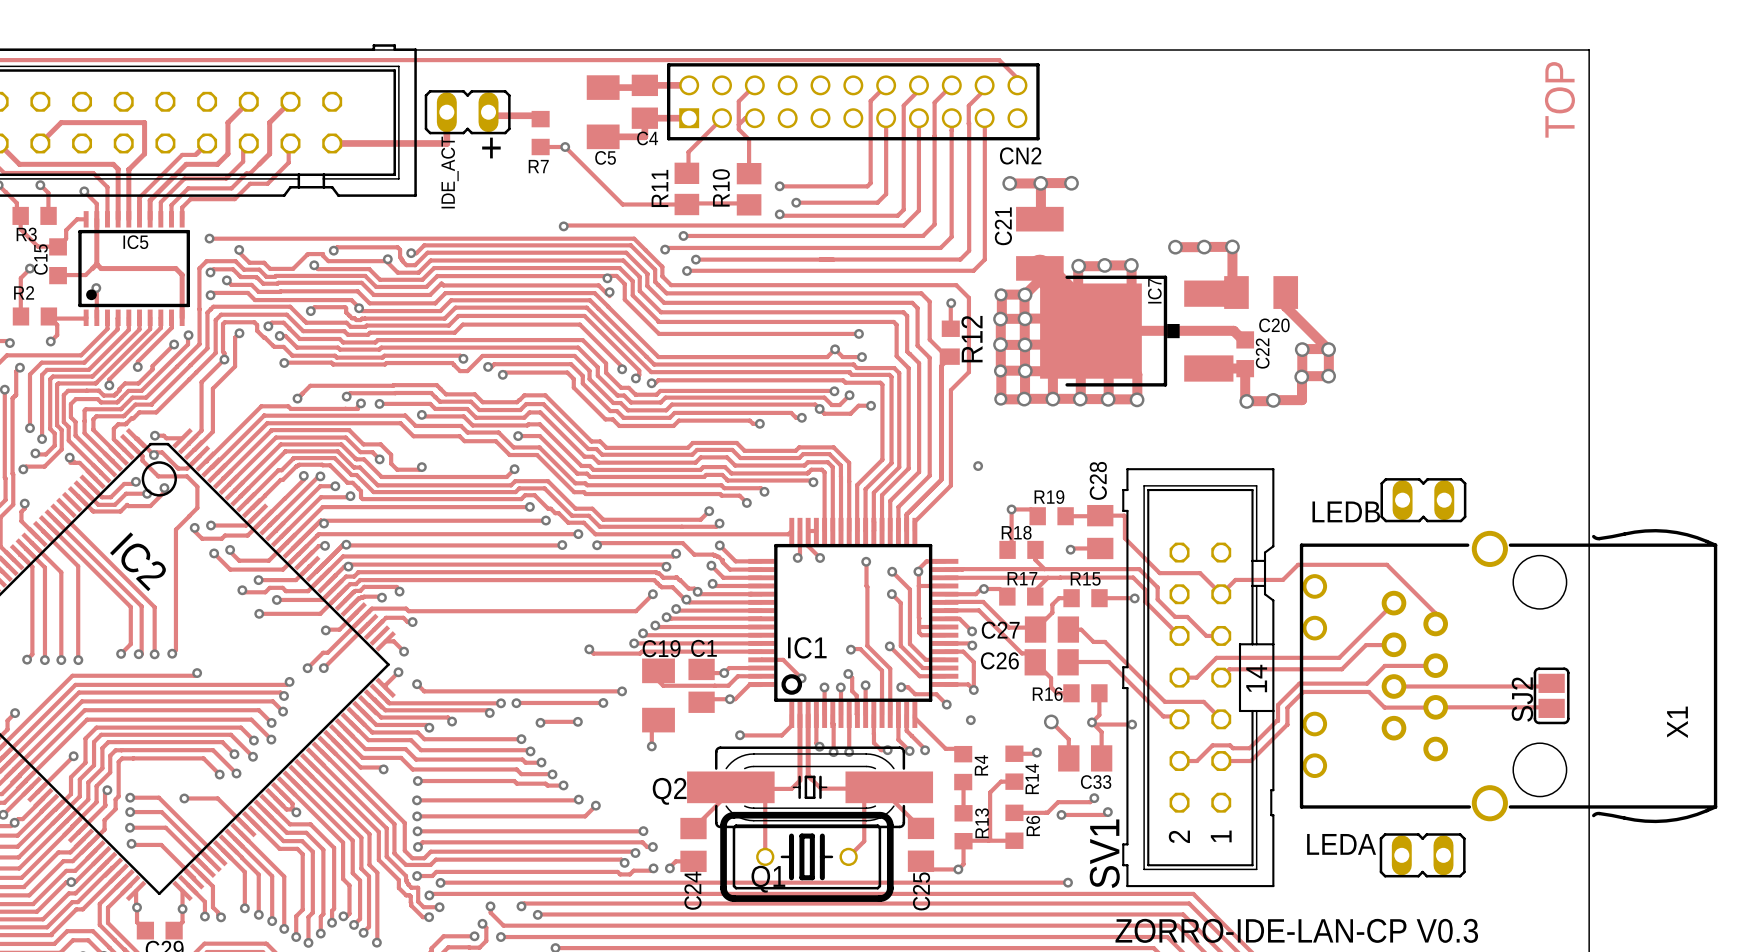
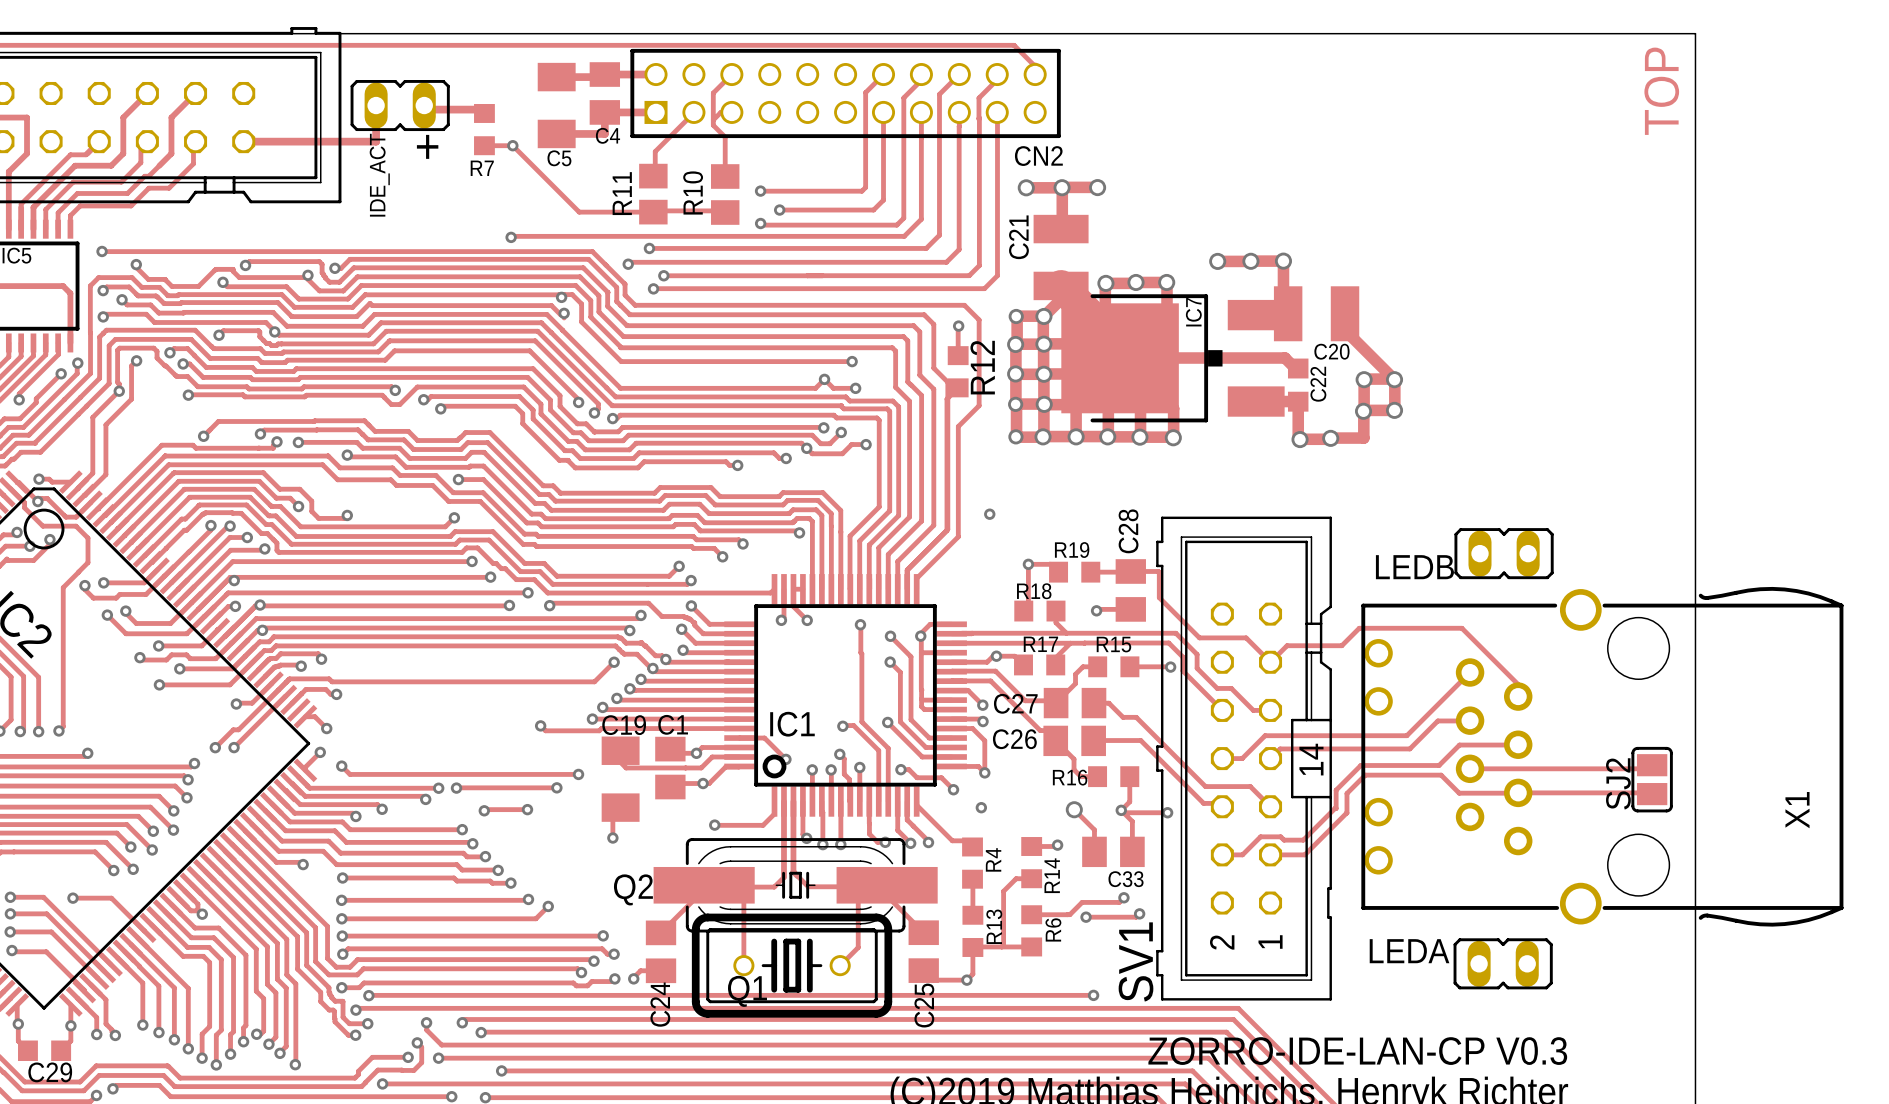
C20 footprint: [1224, 276, 1299, 309] -> [1273, 286, 1360, 342]

